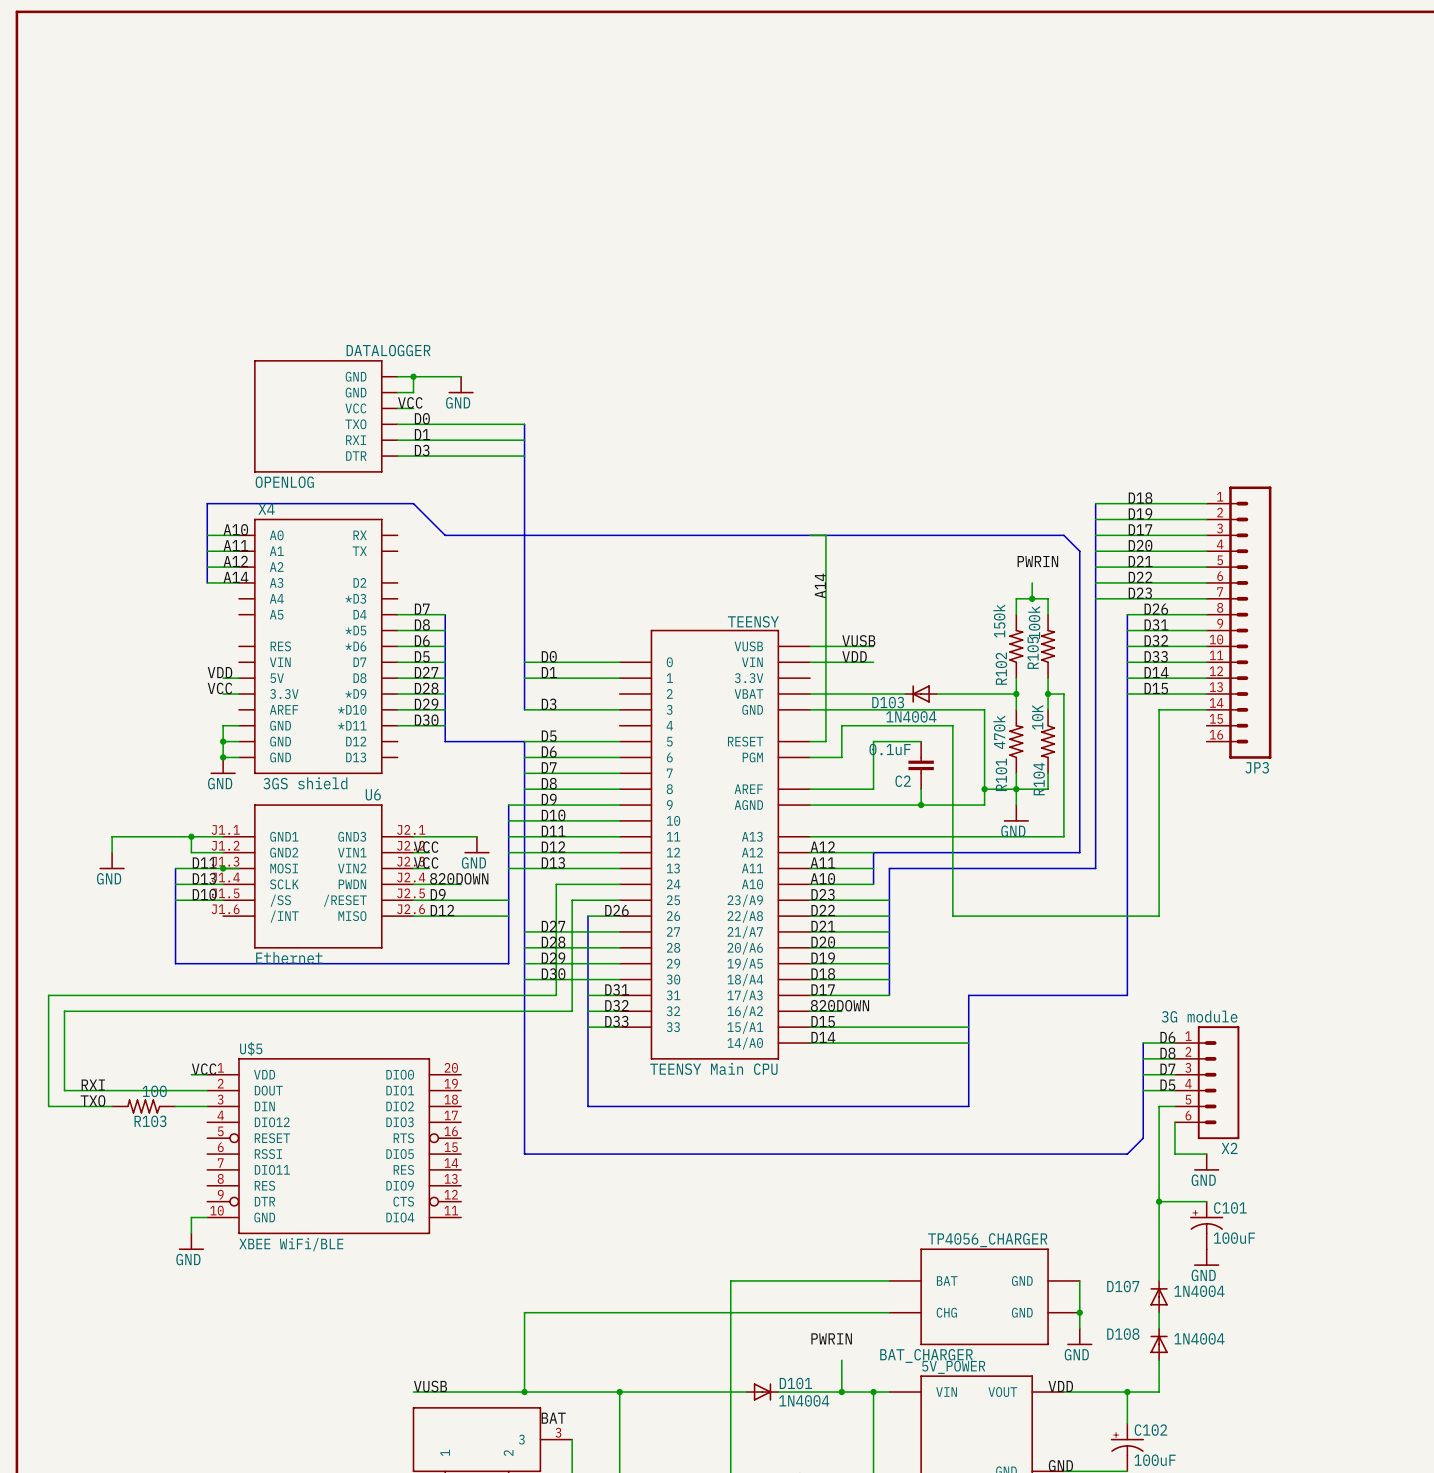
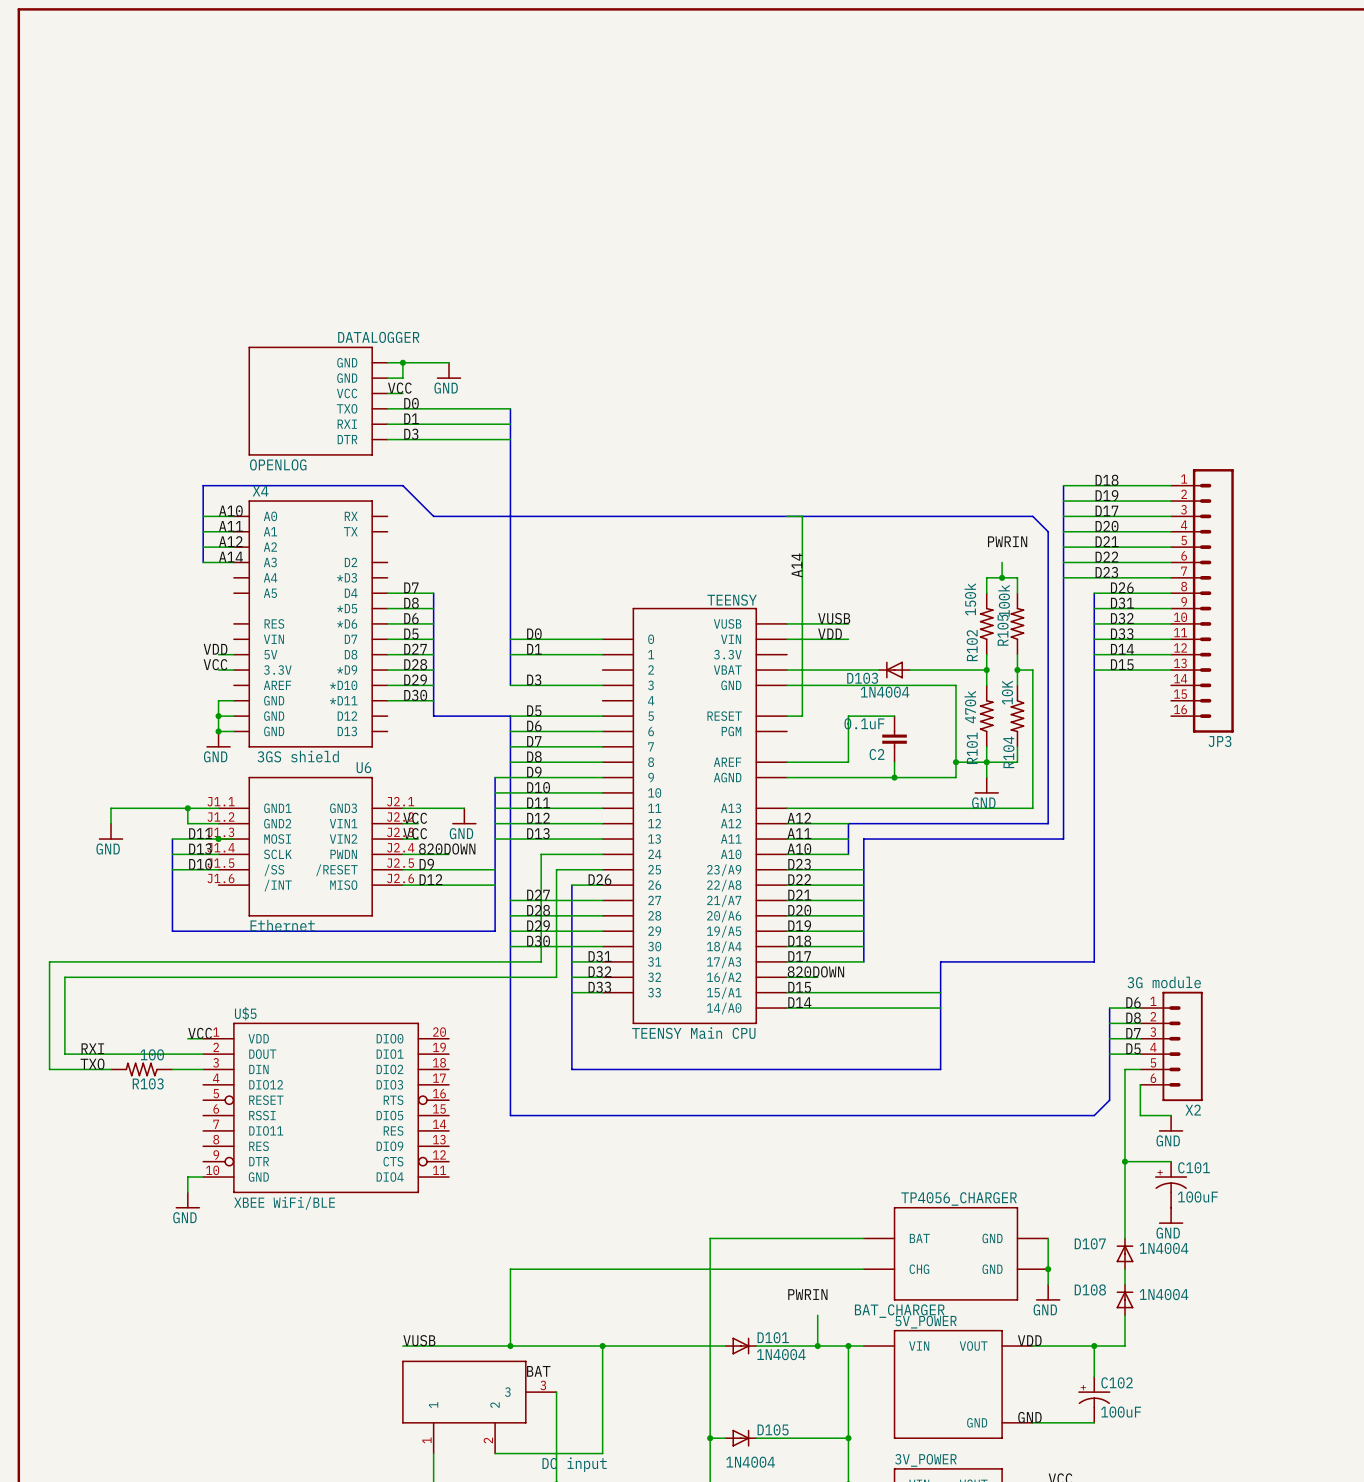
wire: (1206, 709) (1159, 709) (1159, 916) (952, 916) (952, 725) (841, 725) (841, 757) (810, 757) -> none

